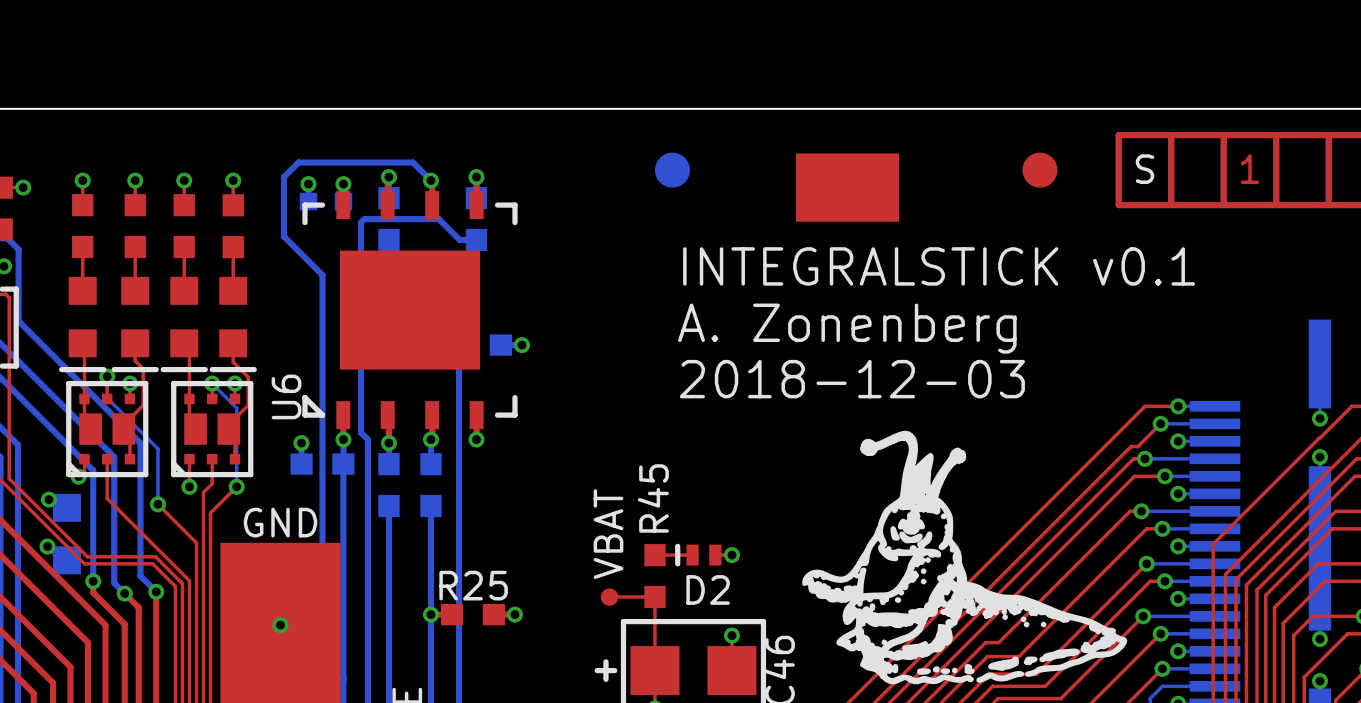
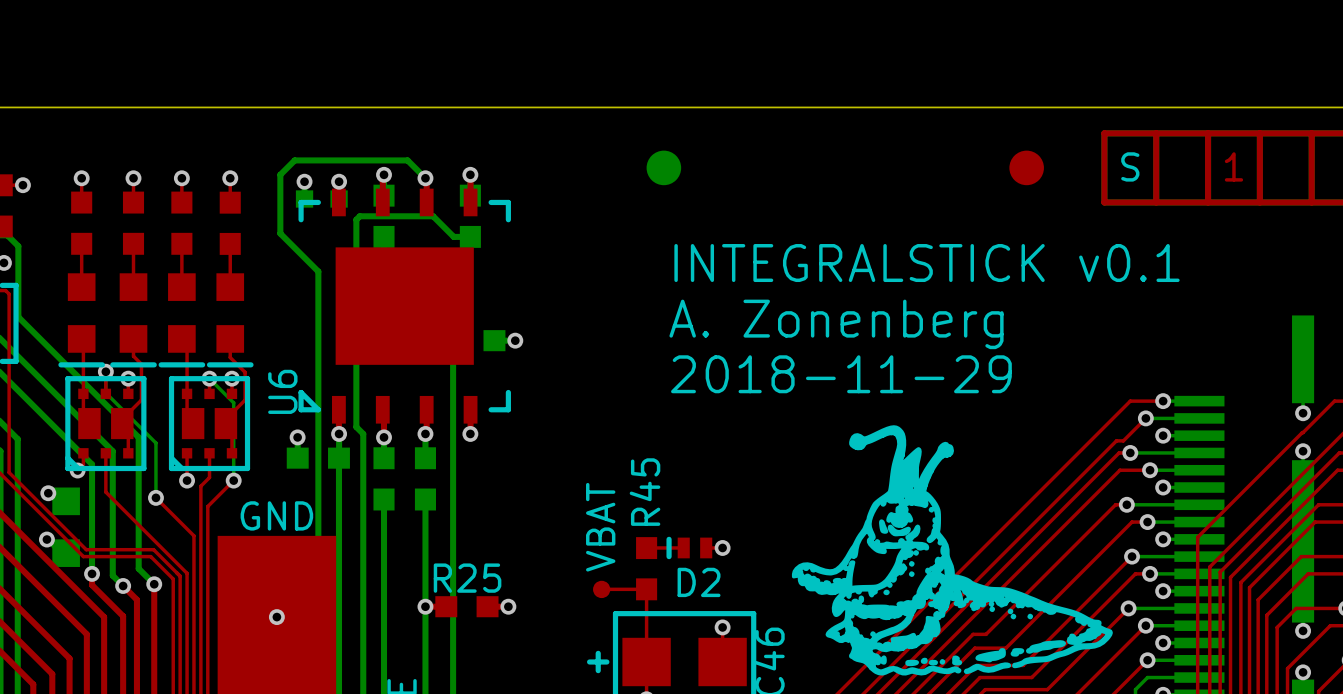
part: (847, 187) -> none
text: 2018-12-03 (852, 379) -> 2018-11-29 (841, 374)

